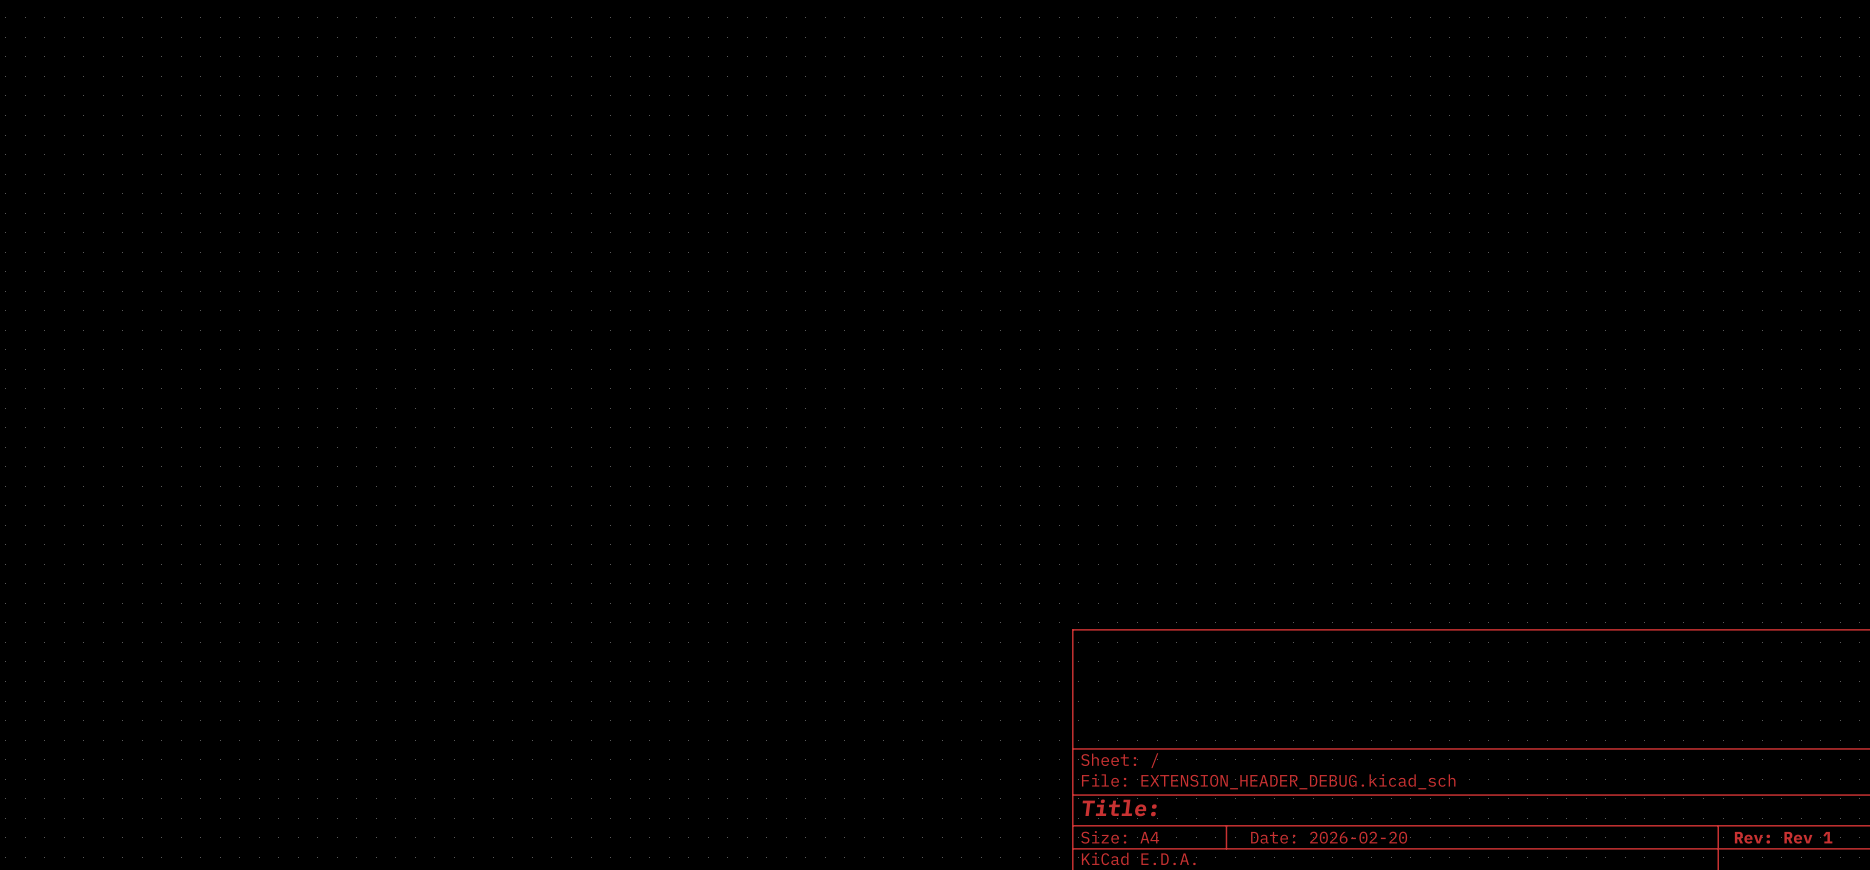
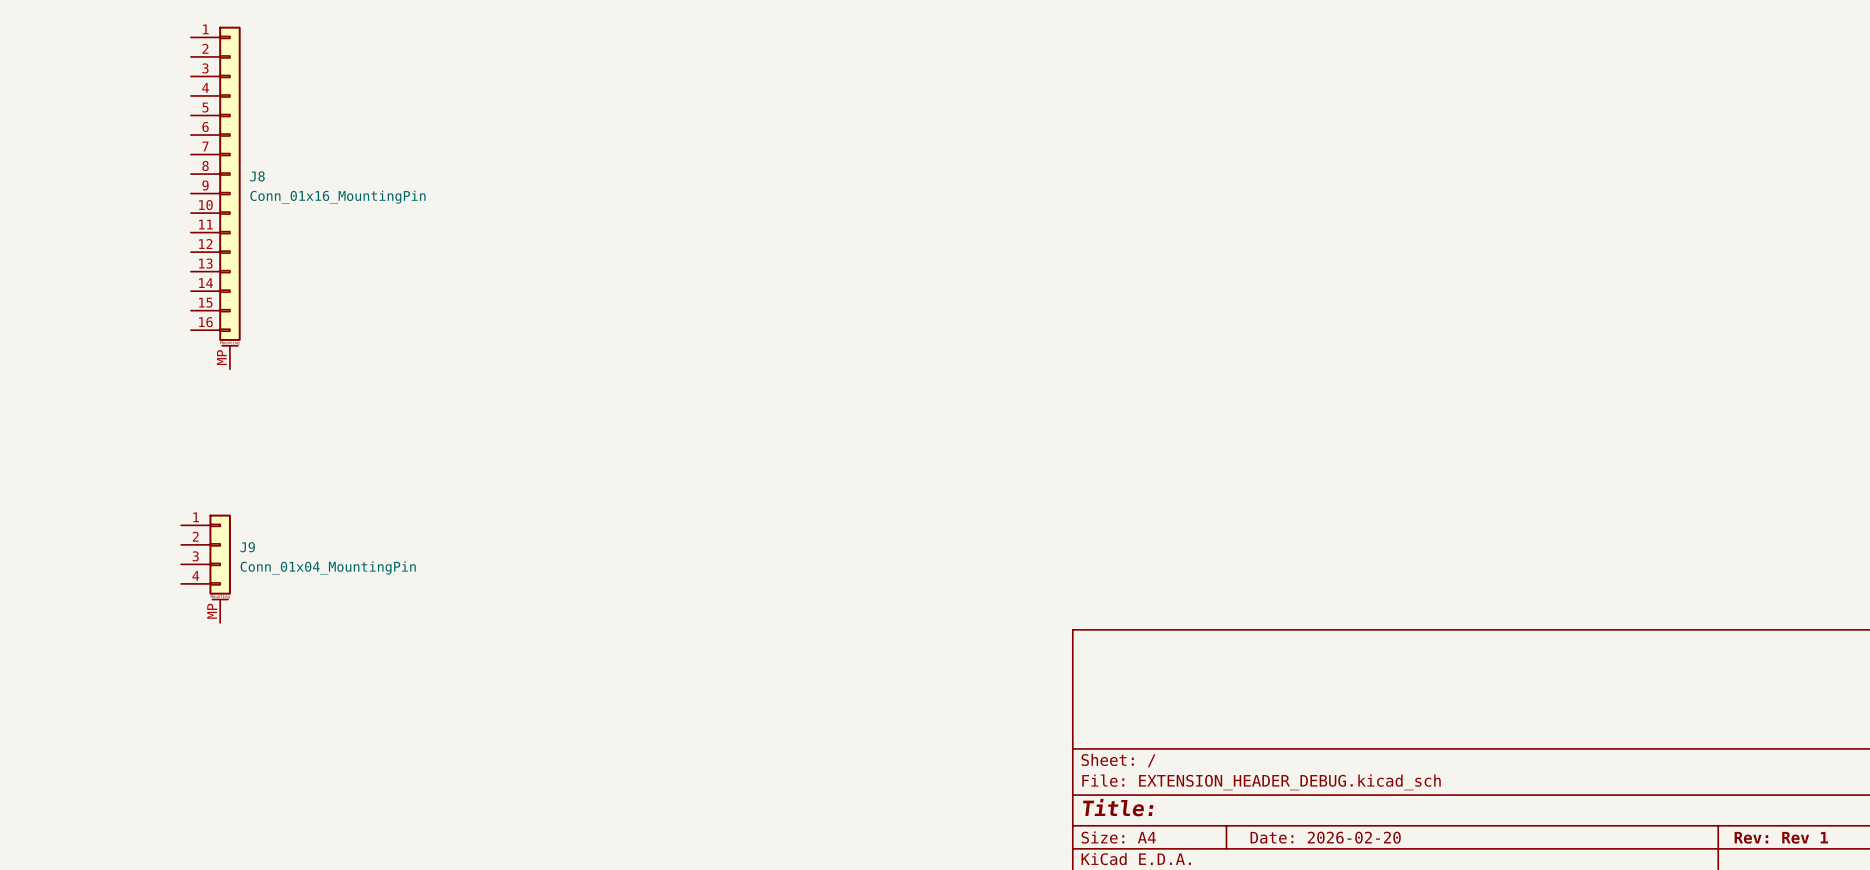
J8: none -> Conn_01x16_MountingPin (215, 197)
J9: none -> Conn_01x04_MountingPin (206, 568)

